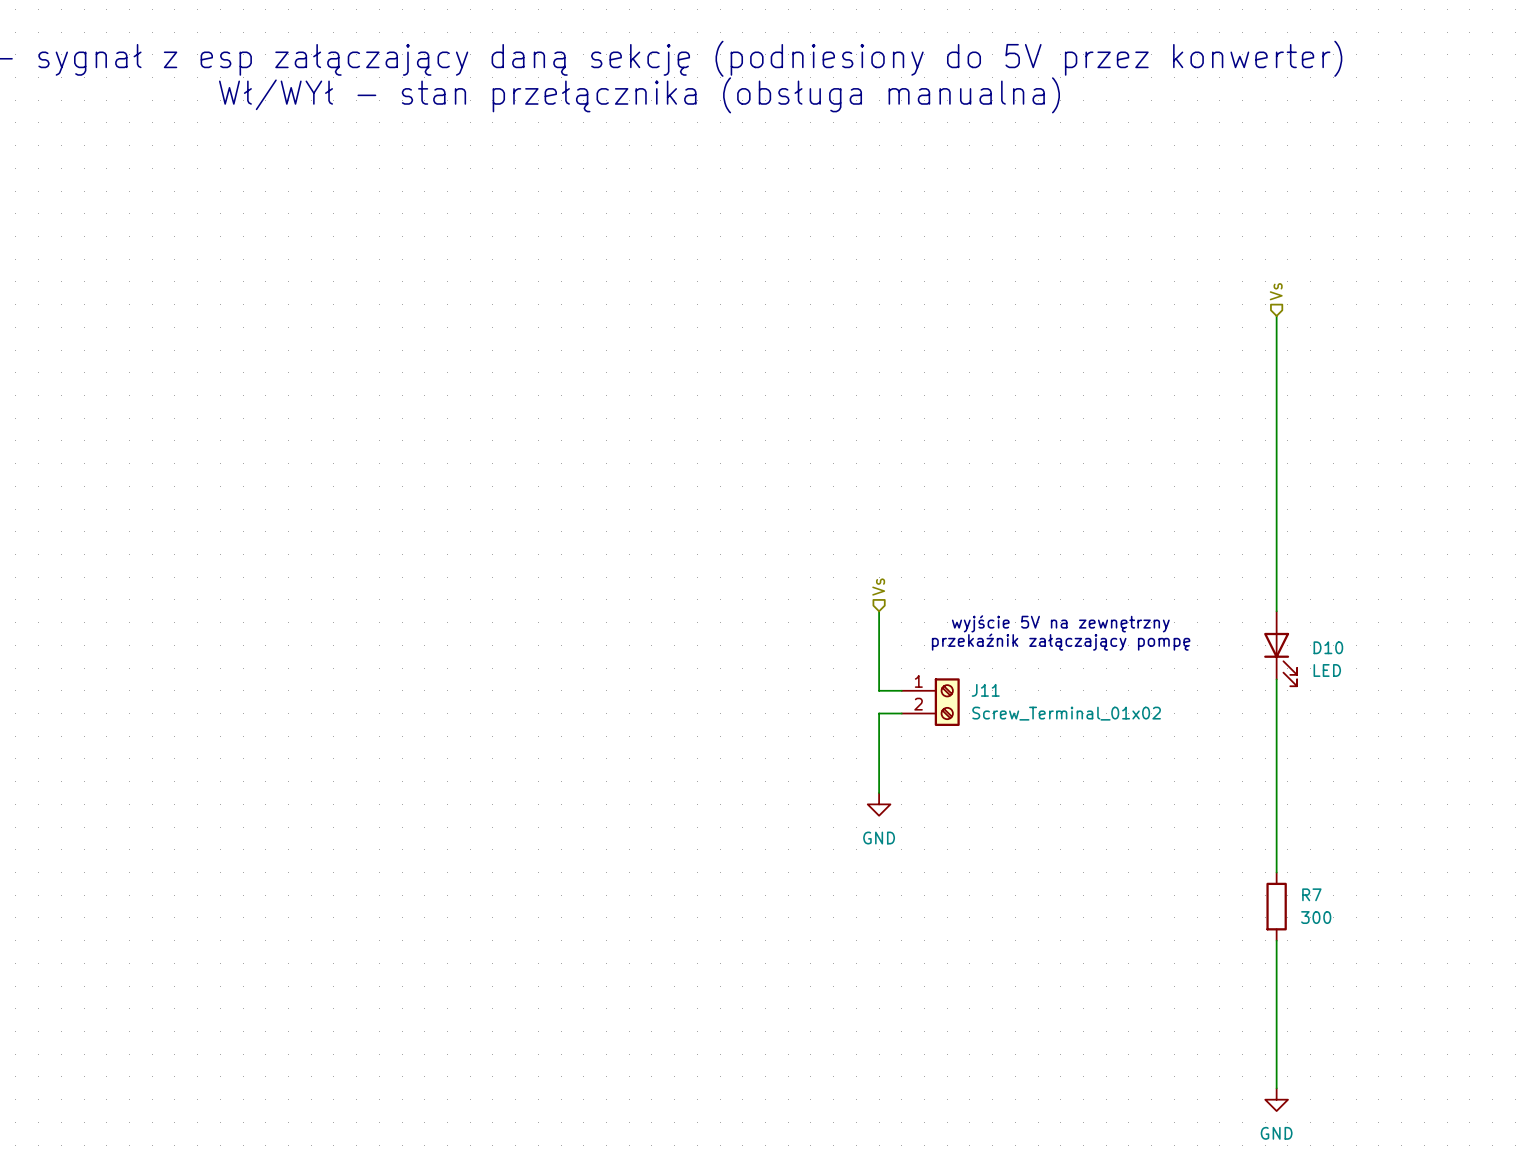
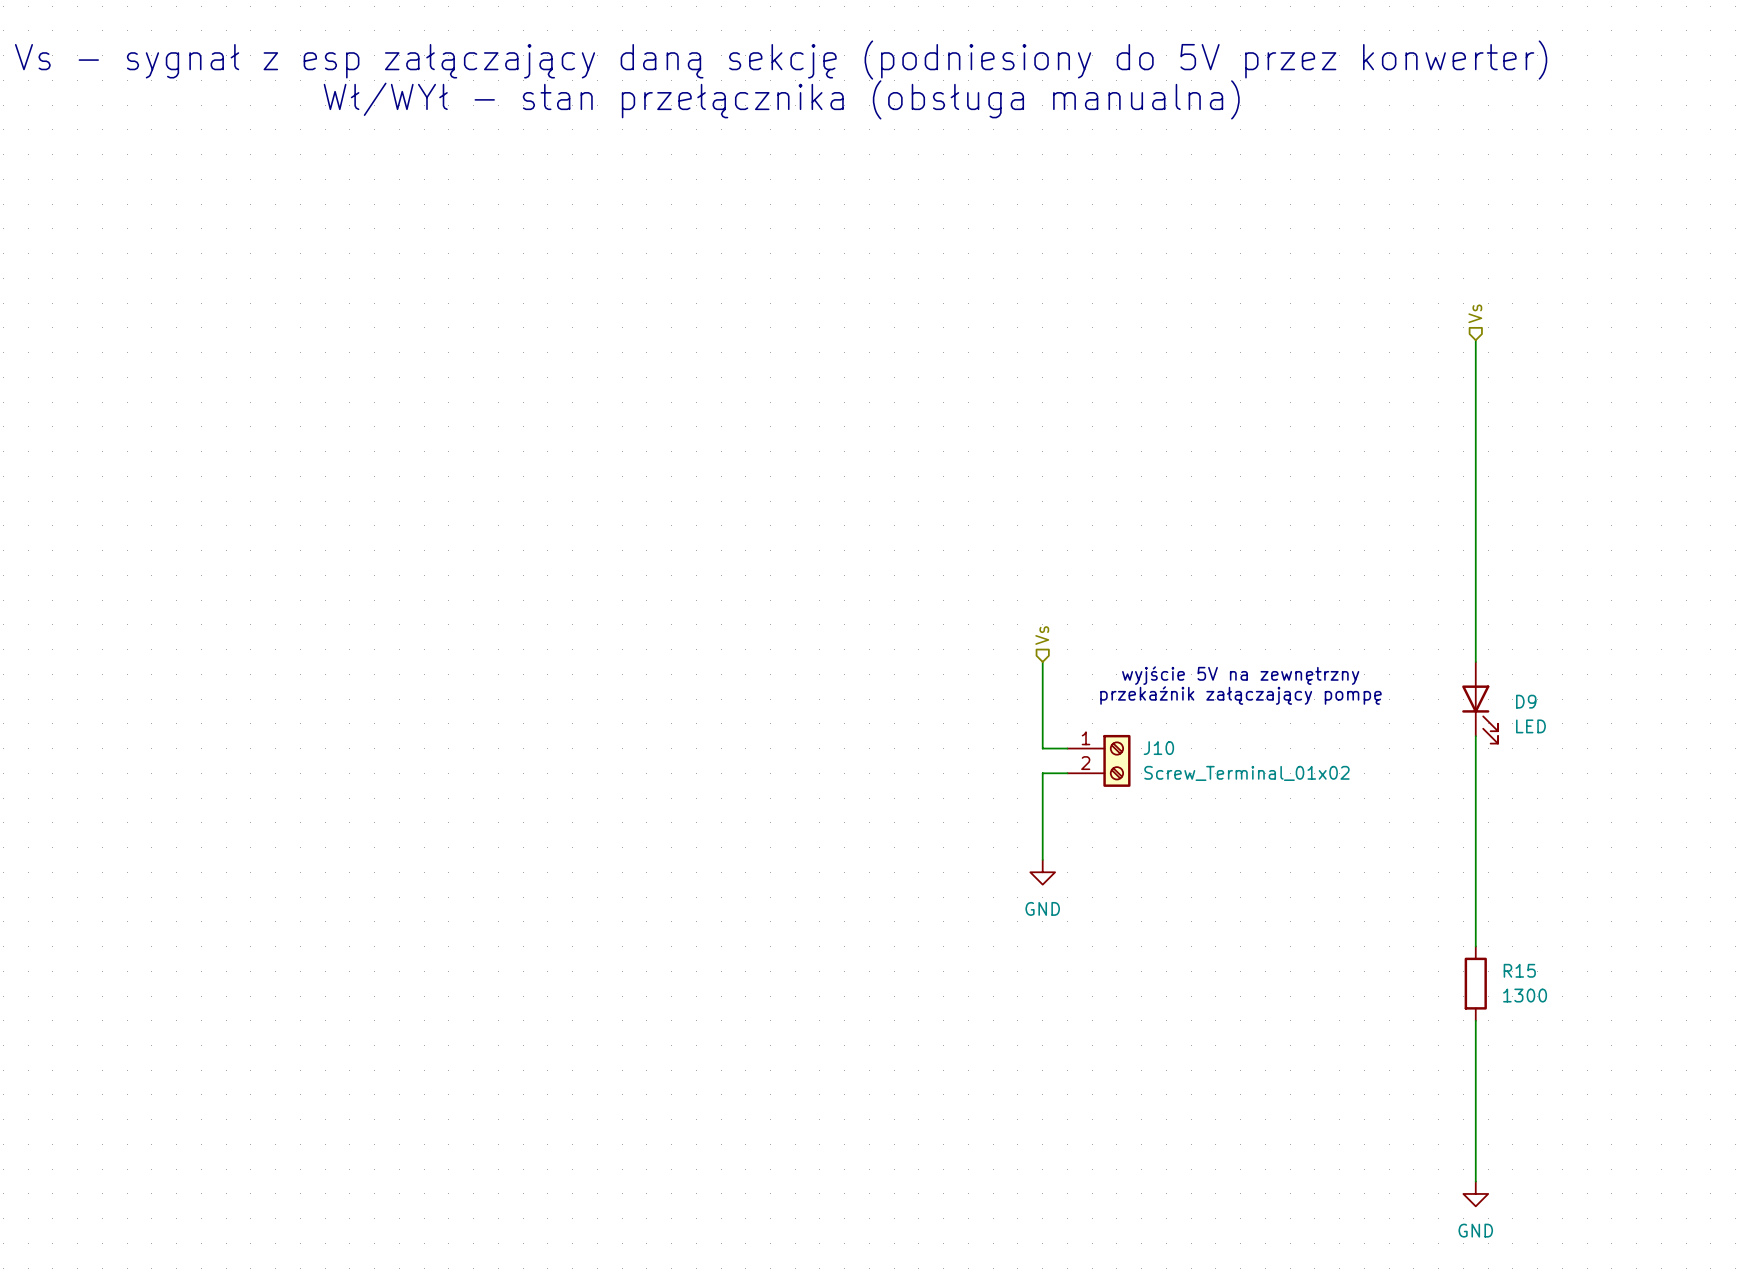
D10 name: D10 (1328, 647) -> D9 (1526, 701)
J11 name: J11 (985, 690) -> J10 (1158, 748)
R7 name: R7 (1311, 894) -> R15 (1519, 970)
R7 value: 300 (1316, 917) -> 1300 (1525, 995)

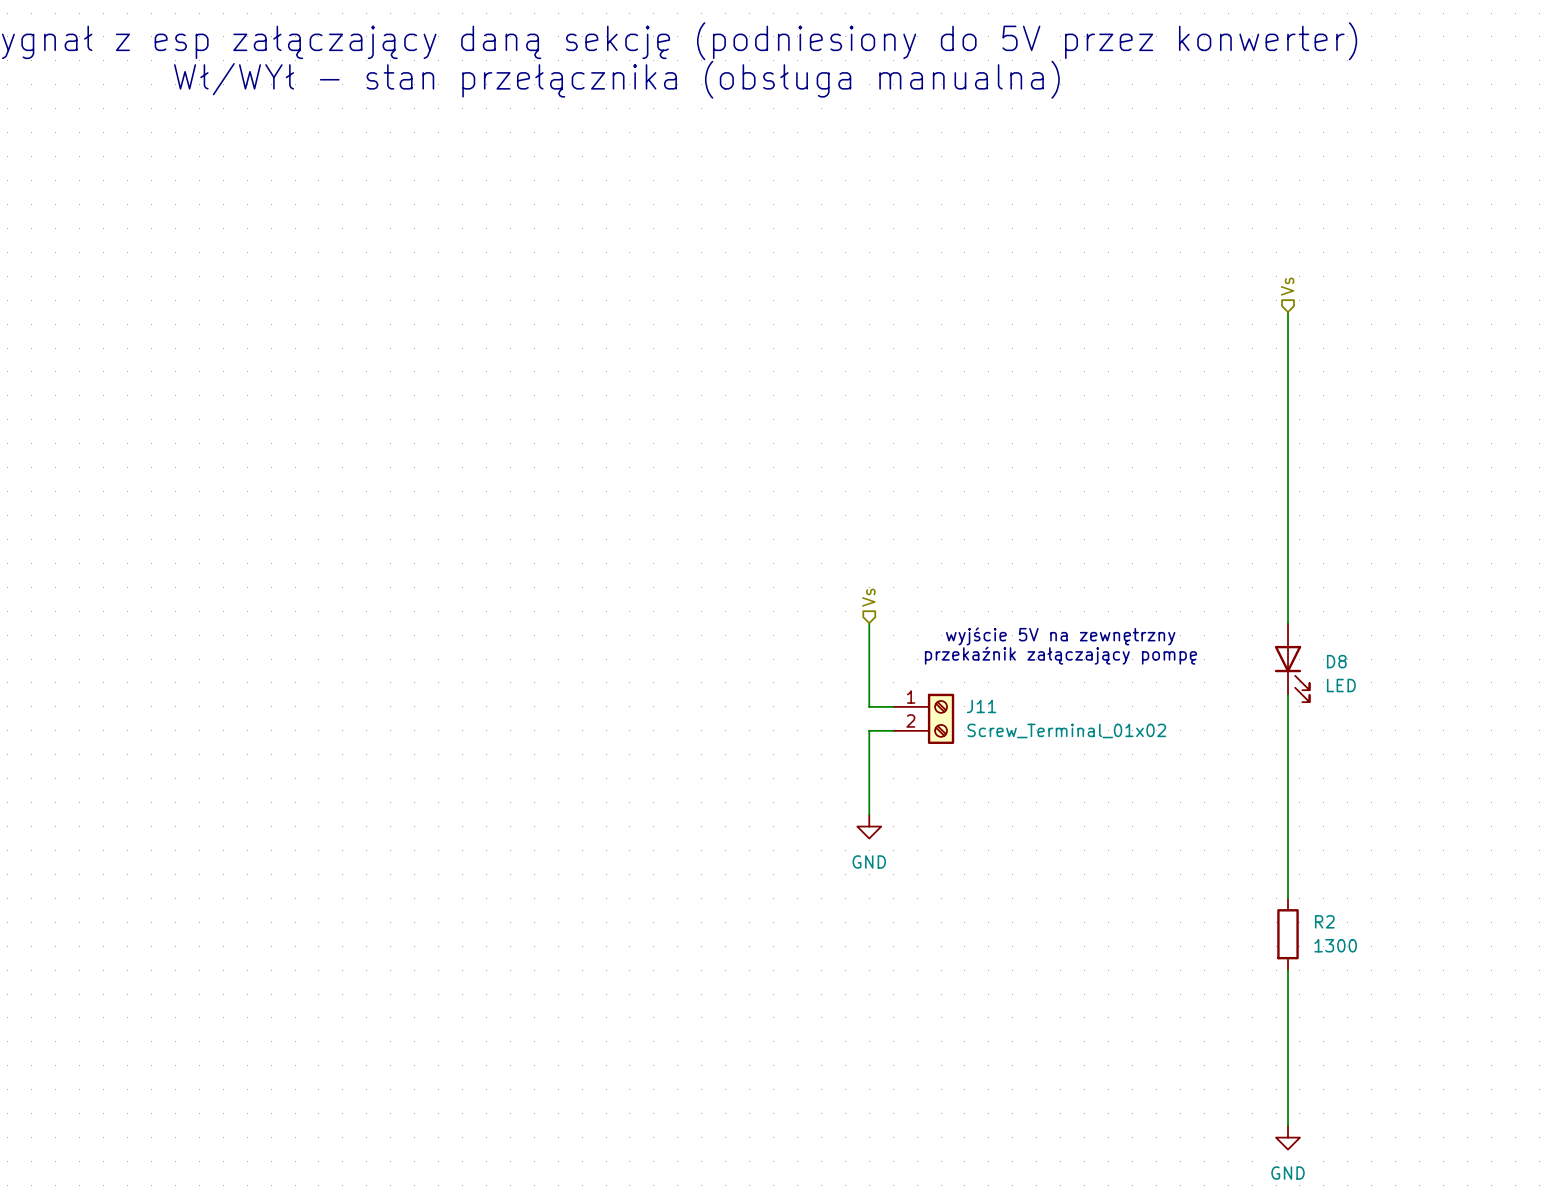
D9 name: D9 (1526, 701) -> D8 (1336, 661)
J10 name: J10 (1158, 748) -> J11 (981, 706)
R15 name: R15 (1519, 970) -> R2 (1324, 921)

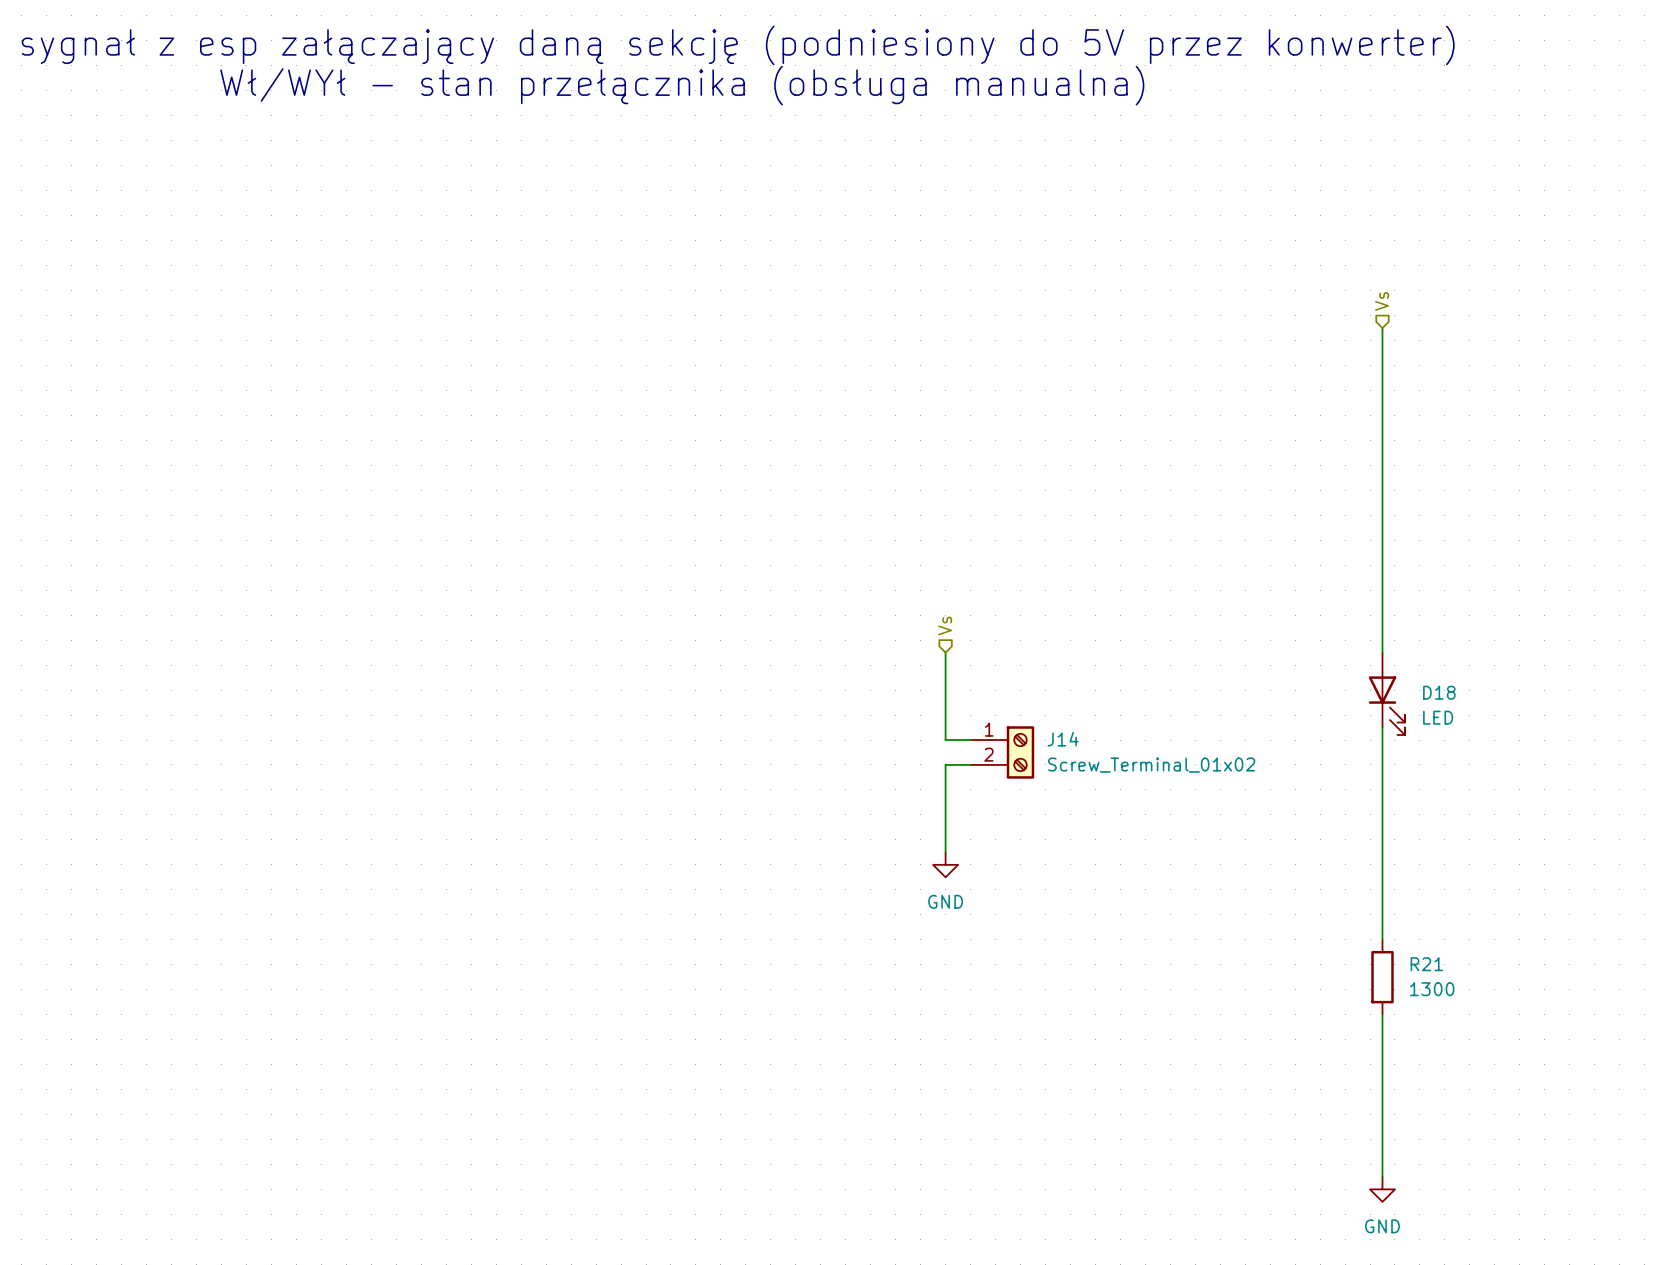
text: wyjście 5V na zewnętrzny (1060, 636) -> none
text: przekaźnik załączający pompę (1060, 655) -> none
D8 name: D8 (1336, 661) -> D18 (1439, 692)
J11 name: J11 (981, 706) -> J14 (1063, 739)
R2 name: R2 (1324, 921) -> R21 (1426, 964)

